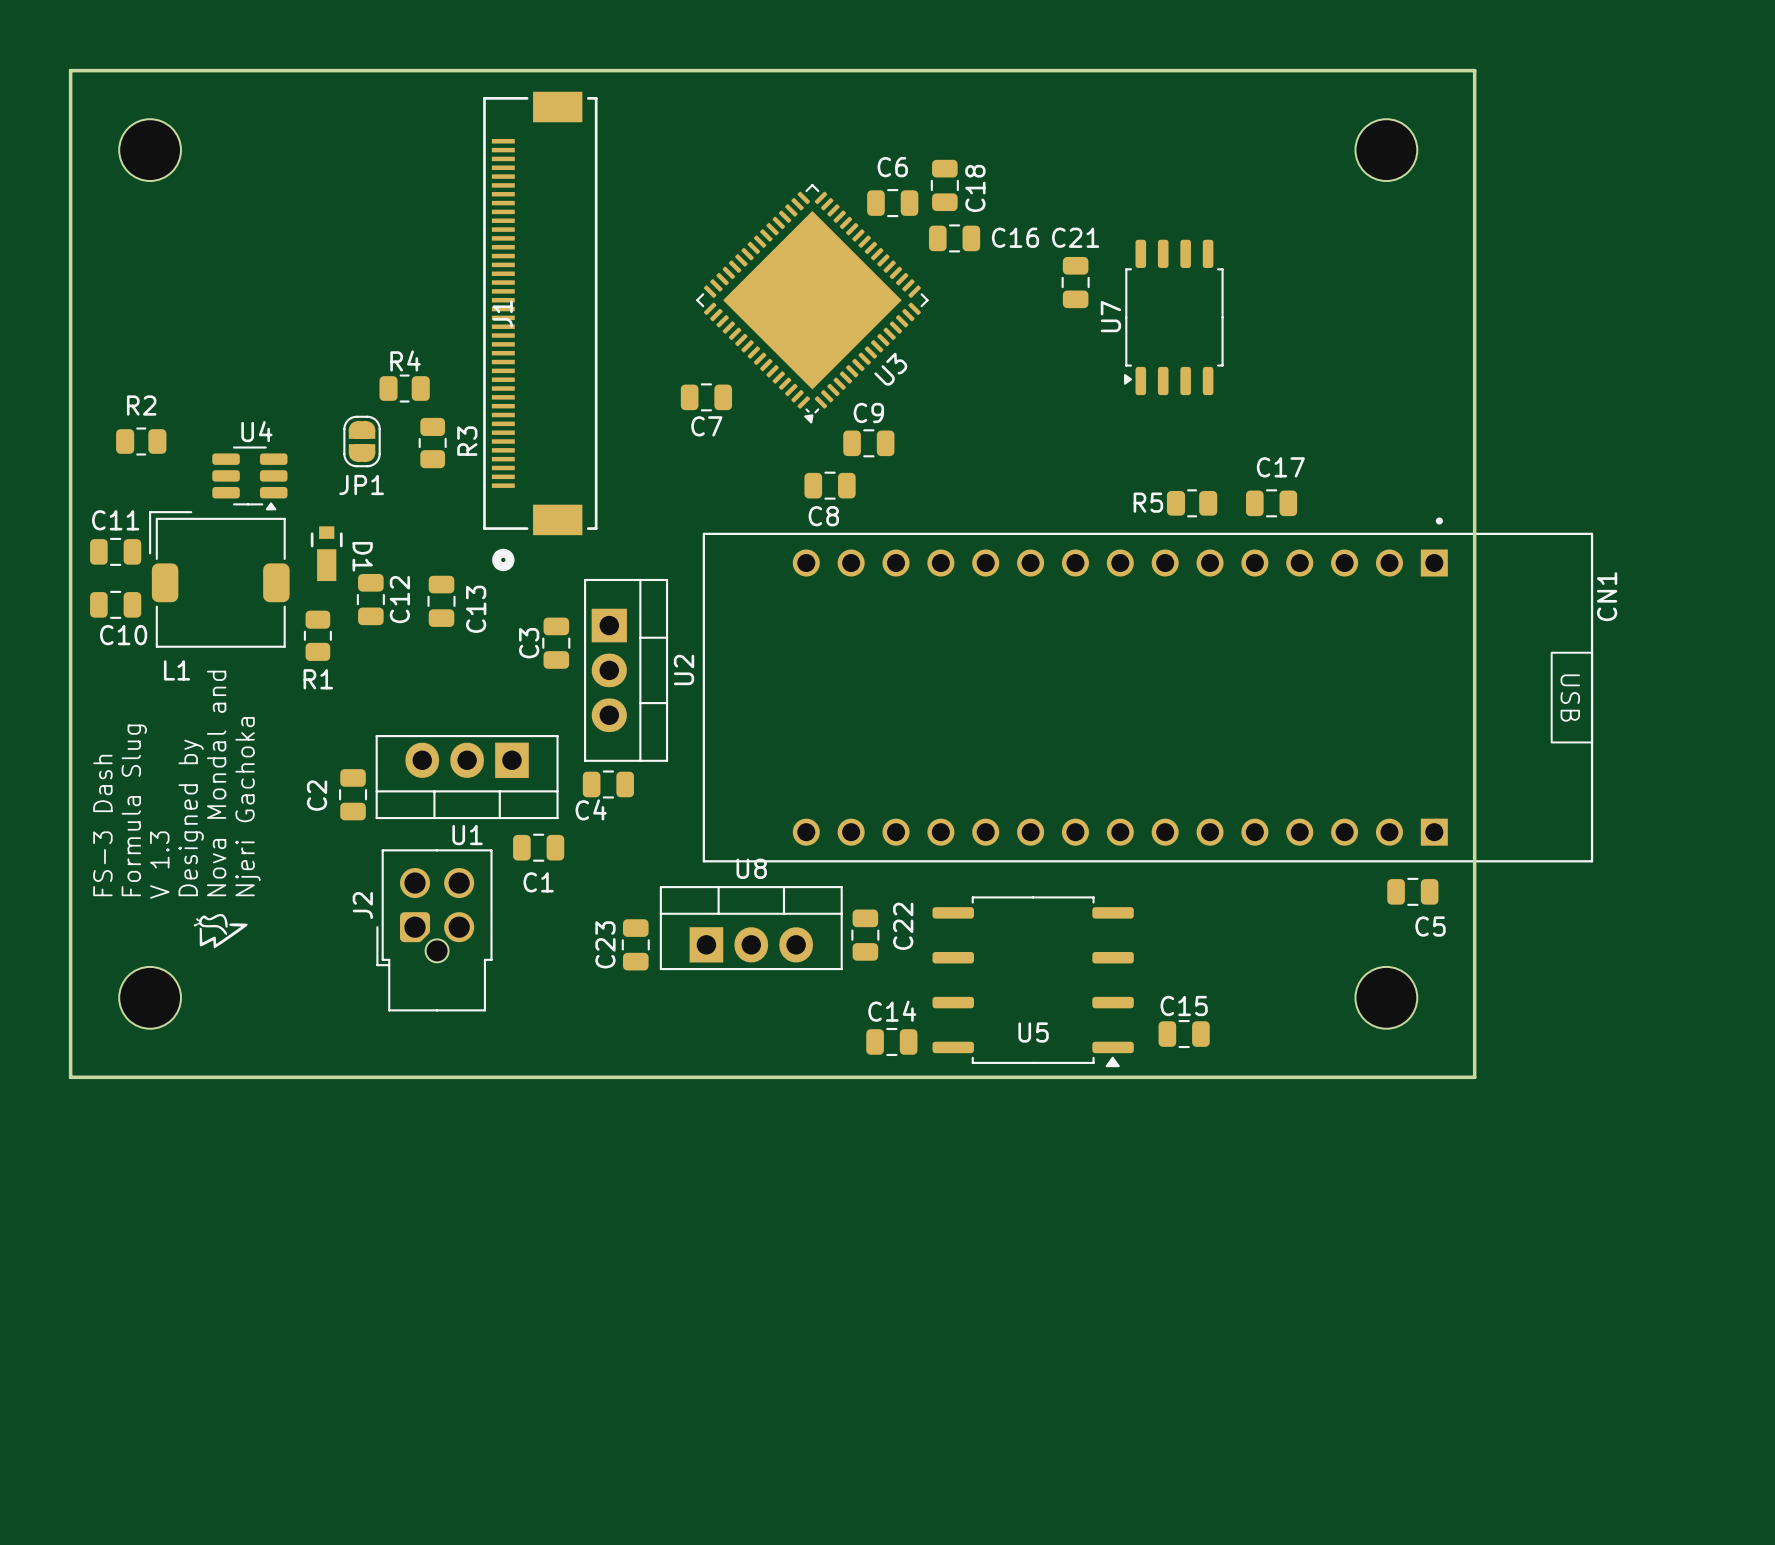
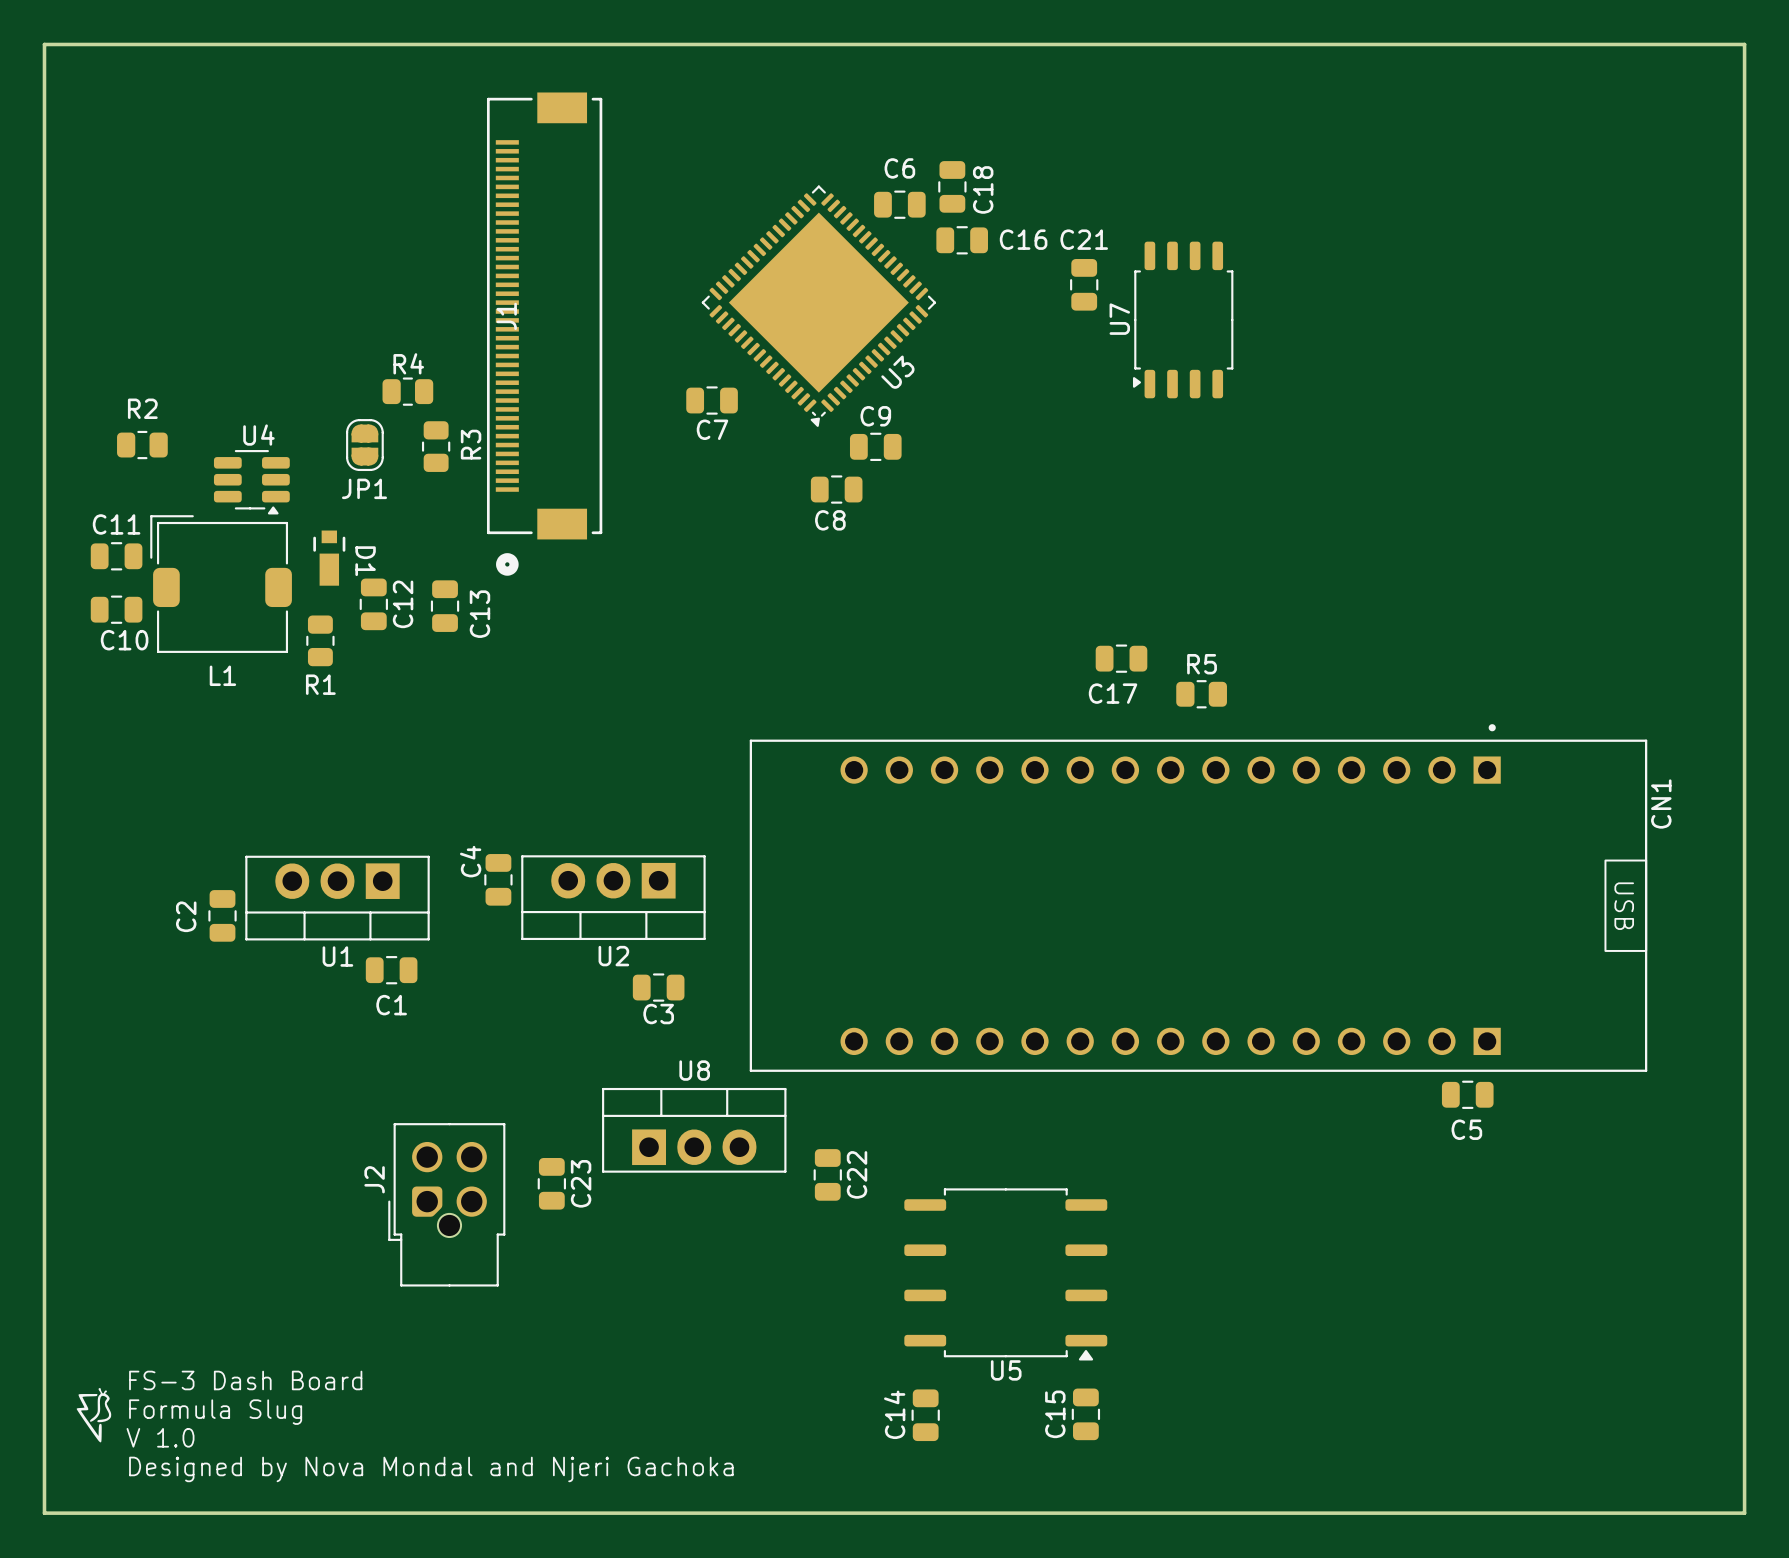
board edge: (70, 70) (1474, 70) (1474, 1077) (70, 1077) (70, 70) -> (44, 44) (44, 1513) (1744, 1513) (1744, 44) (44, 44)
part: (150, 150) -> none
part: (1386, 150) -> none
C17 name position: C17 (1280, 467) -> C17 (1113, 693)
R5 name position: R5 (1148, 502) -> R5 (1202, 664)
R5 position: (1192, 503) -> (1201, 694)
C17 position: (1271, 503) -> (1121, 658)
C3 name position: C3 (529, 643) -> C3 (658, 1014)
C3 rotation: 0° (556, 643) -> 90° clockwise (658, 987)
C3 position: (556, 643) -> (658, 987)
L1 name position: L1 (177, 670) -> L1 (222, 675)
U2 rotation: 0° (626, 670) -> 90° clockwise (613, 897)
U2 position: (626, 670) -> (613, 897)
CN1 position: (1147, 689) -> (1198, 898)
U1 position: (467, 777) -> (337, 898)
text: Nova Mondal and (216, 783) -> none
C4 rotation: 0° (608, 784) -> 90° clockwise (498, 879)
C4 position: (608, 784) -> (498, 879)
C2 position: (353, 794) -> (222, 915)
text: Njeri Gachoka (248, 806) -> none
text: Formula Slug (134, 810) -> none
text: Designed by (191, 817) -> none
text: FS-3 Dash (102, 825) -> none
C1 position: (538, 847) -> (391, 970)
text: V 1.3 (159, 865) -> none
C5 position: (1412, 891) -> (1467, 1094)
drawing: [193, 913, 248, 949] -> none
C22 name position: C22 (903, 926) -> C22 (857, 1174)
C5 name position: C5 (1430, 926) -> C5 (1466, 1129)
U8 position: (751, 928) -> (694, 1130)
J2 position: (434, 930) -> (446, 1204)
C22 position: (865, 935) -> (827, 1174)
C23 name position: C23 (605, 944) -> C23 (581, 1183)
C23 position: (635, 944) -> (551, 1183)
U5 position: (1033, 981) -> (1005, 1274)
part: (150, 997) -> none
part: (1386, 997) -> none
C15 name position: C15 (1184, 1006) -> C15 (1055, 1414)
C14 name position: C14 (892, 1011) -> C14 (894, 1414)
U5 name position: U5 (1033, 1032) -> U5 (1006, 1370)
C15 rotation: 0° (1184, 1034) -> 90° clockwise (1085, 1414)
C15 position: (1184, 1034) -> (1085, 1414)
C14 rotation: 0° (891, 1041) -> 90° clockwise (925, 1415)
C14 position: (891, 1041) -> (925, 1415)
text: none -> FS-3 Dash Board (245, 1380)
drawing: none -> [76, 1388, 112, 1443]
text: none -> Formula Slug (215, 1412)
text: none -> V 1.0 (160, 1437)
text: none -> Designed by Nova Mondal and Njeri Gachoka (431, 1469)

